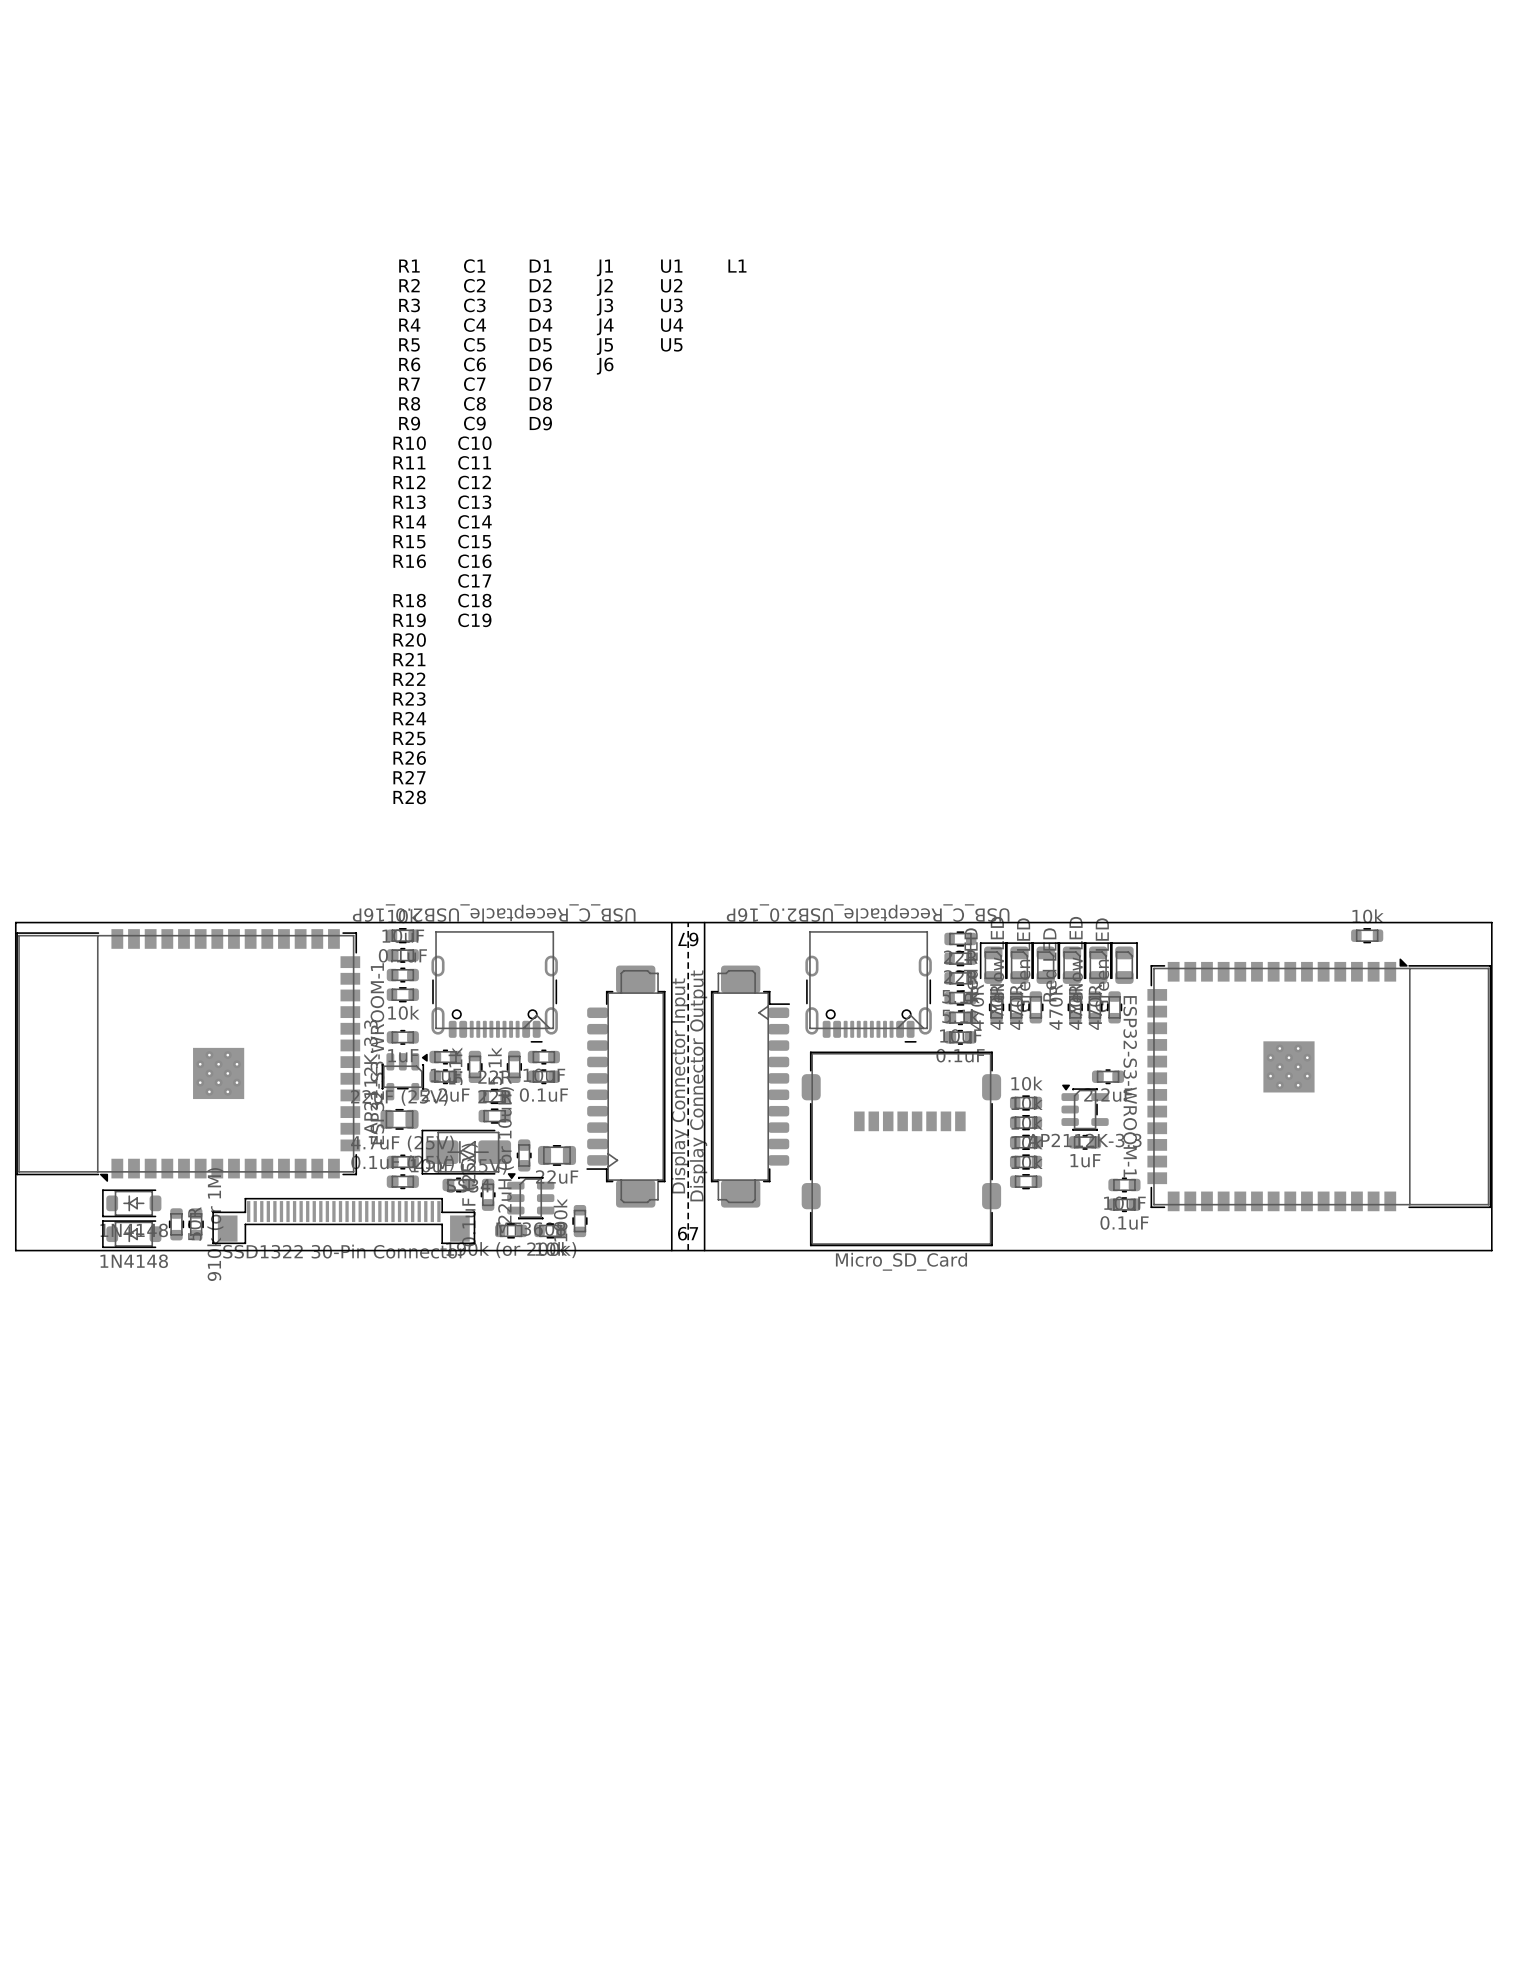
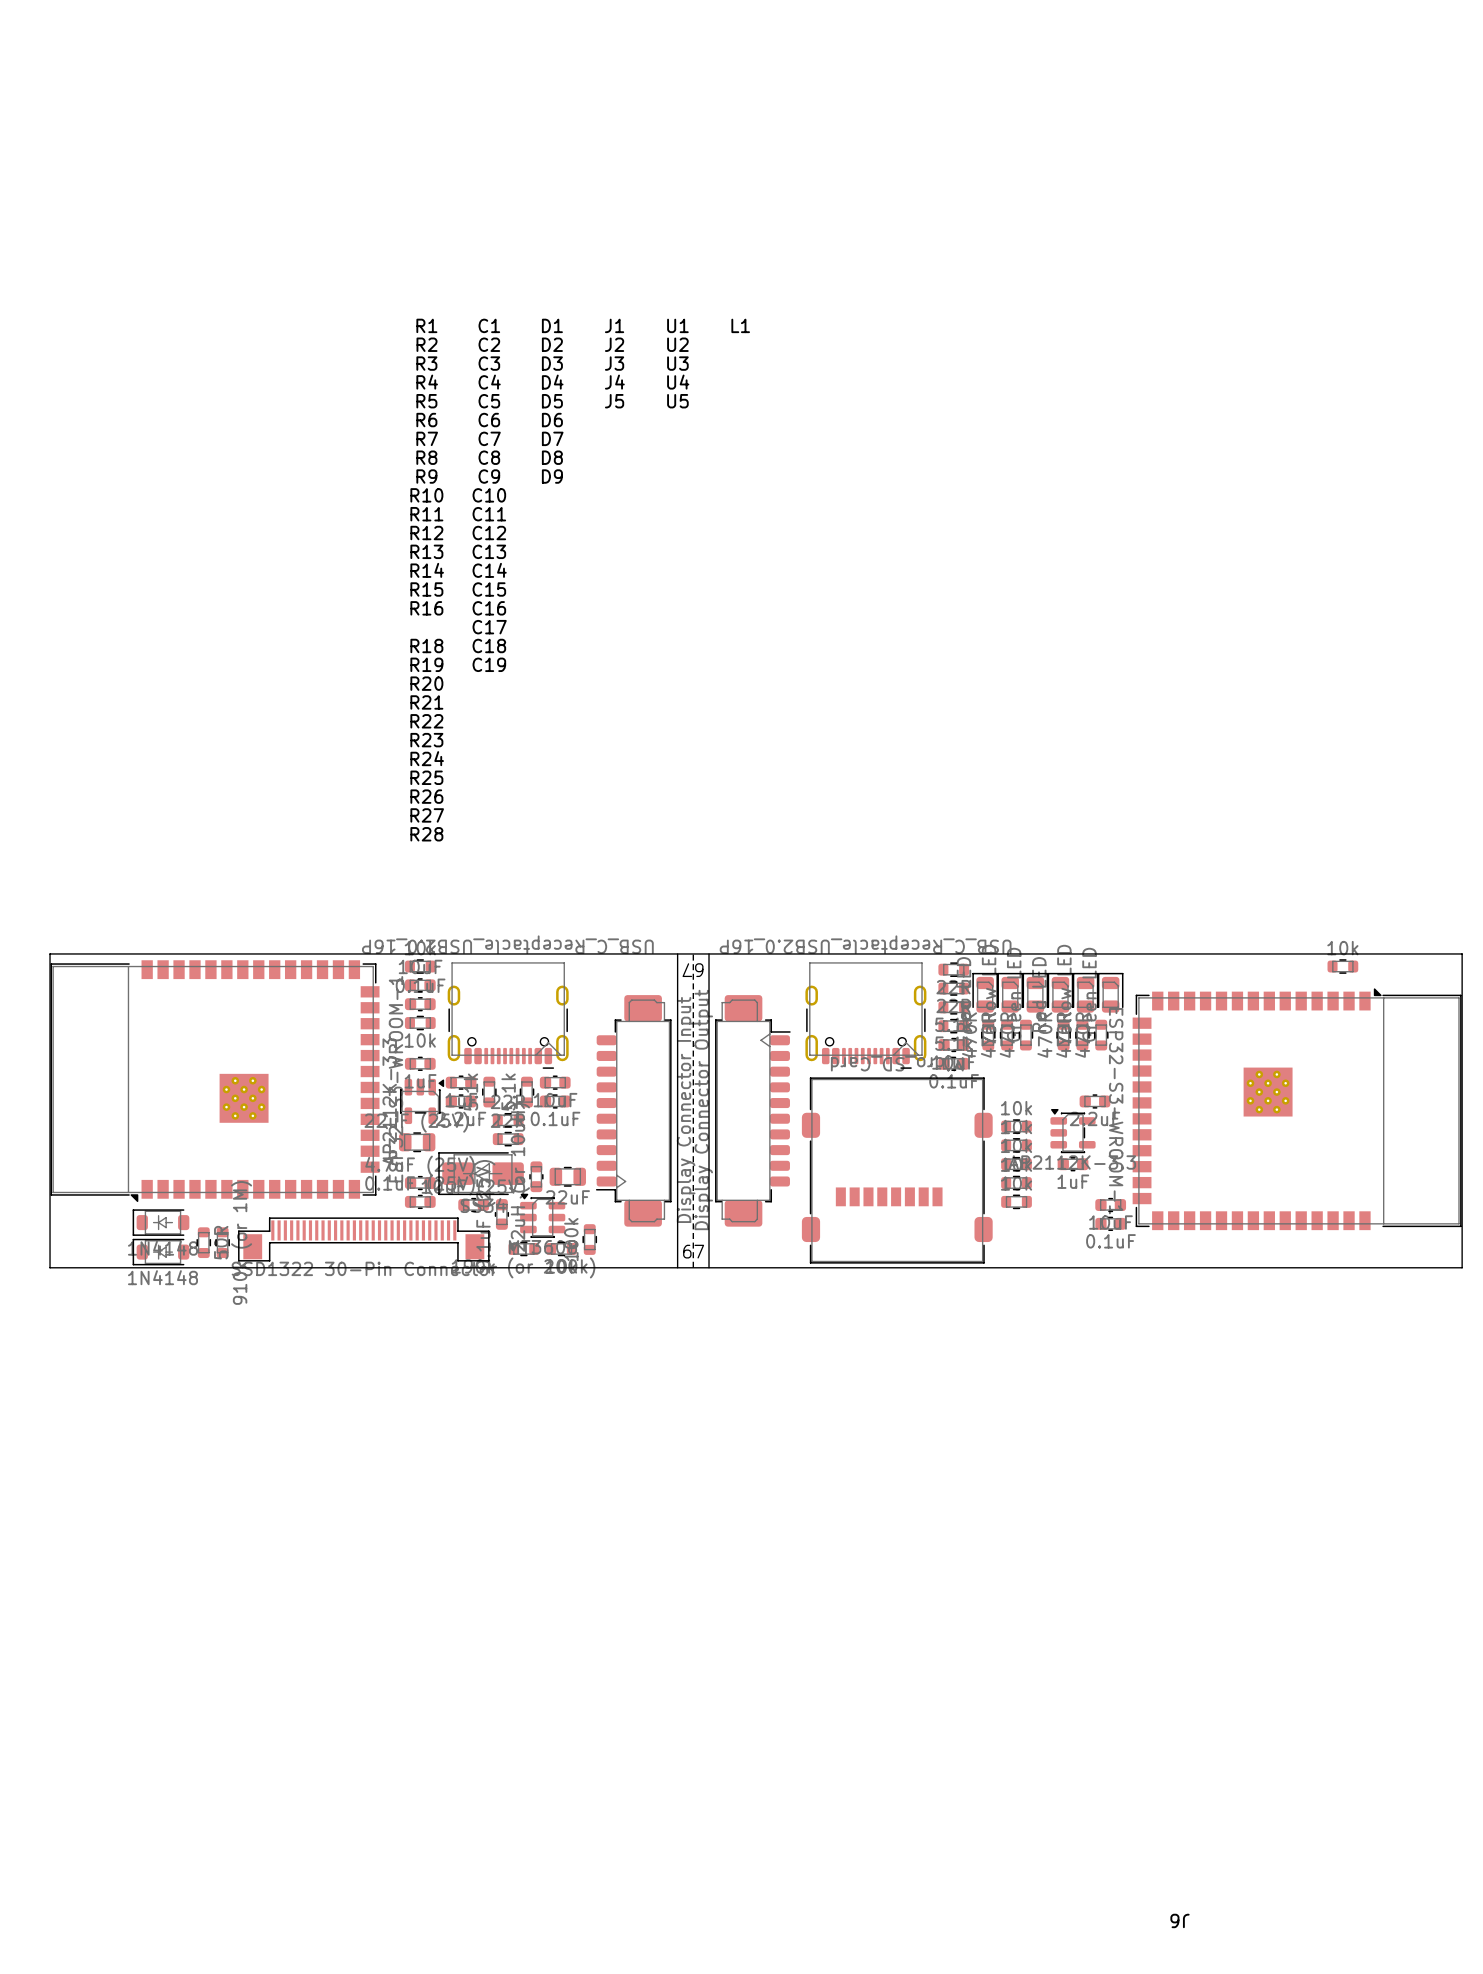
J6 rotation: 0° (901, 1148) -> 180° (897, 1170)

